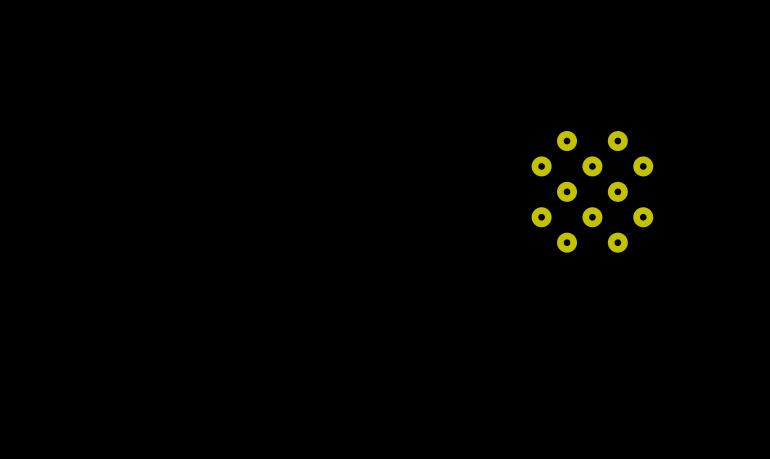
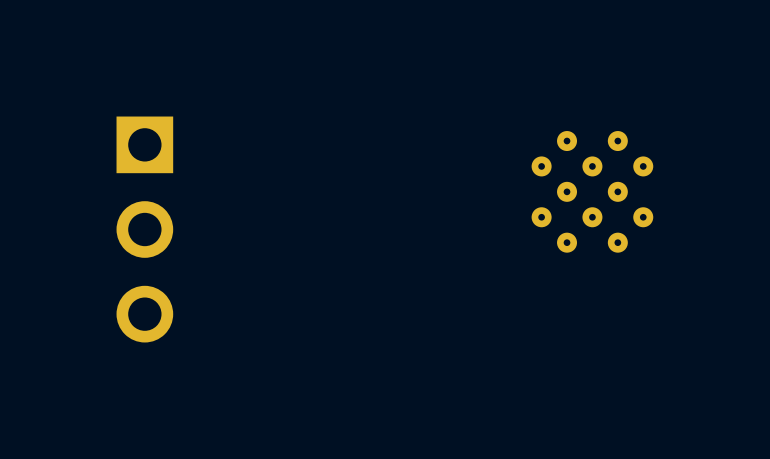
part: none -> (144, 229)

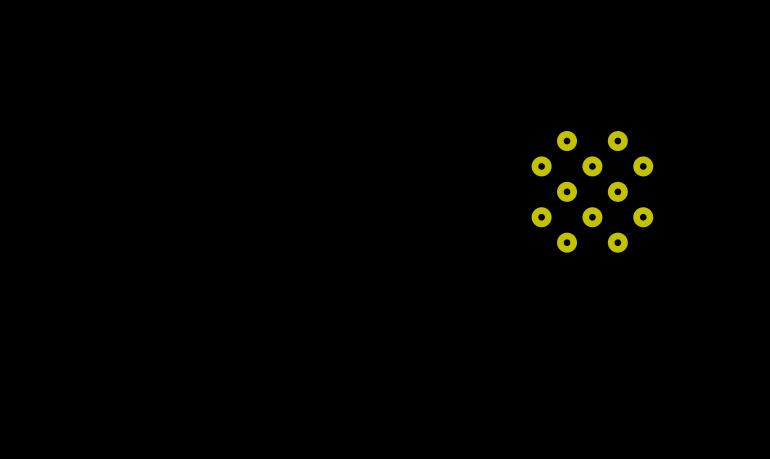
part: (144, 229) -> none

